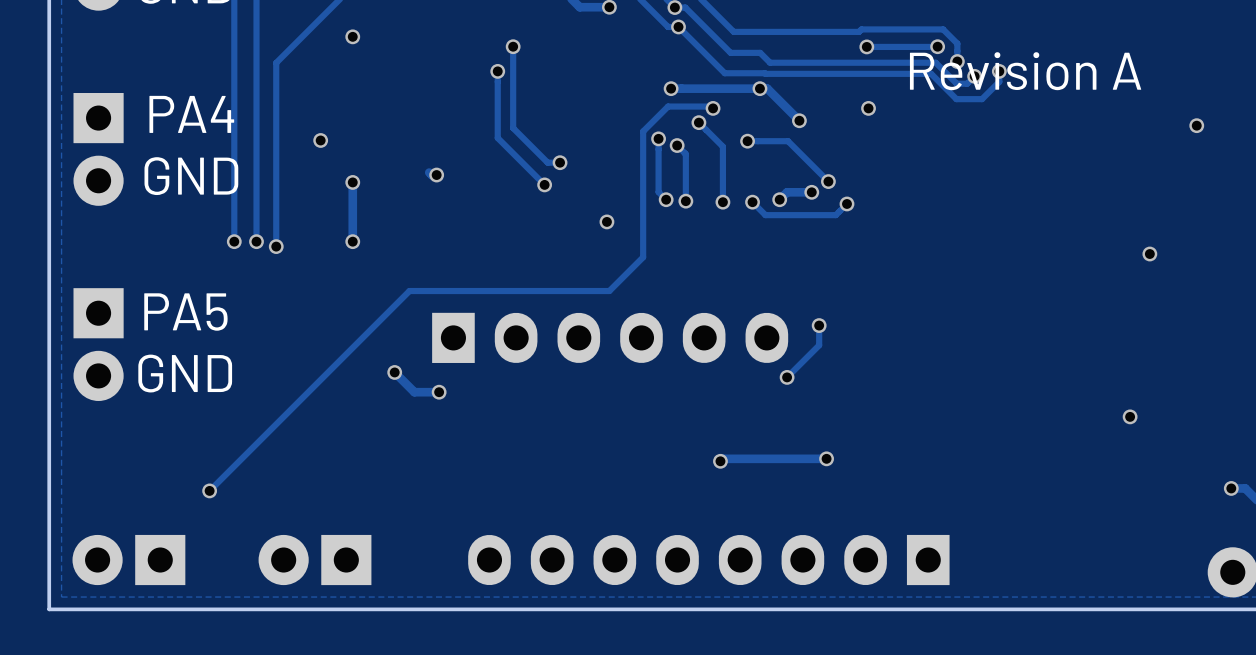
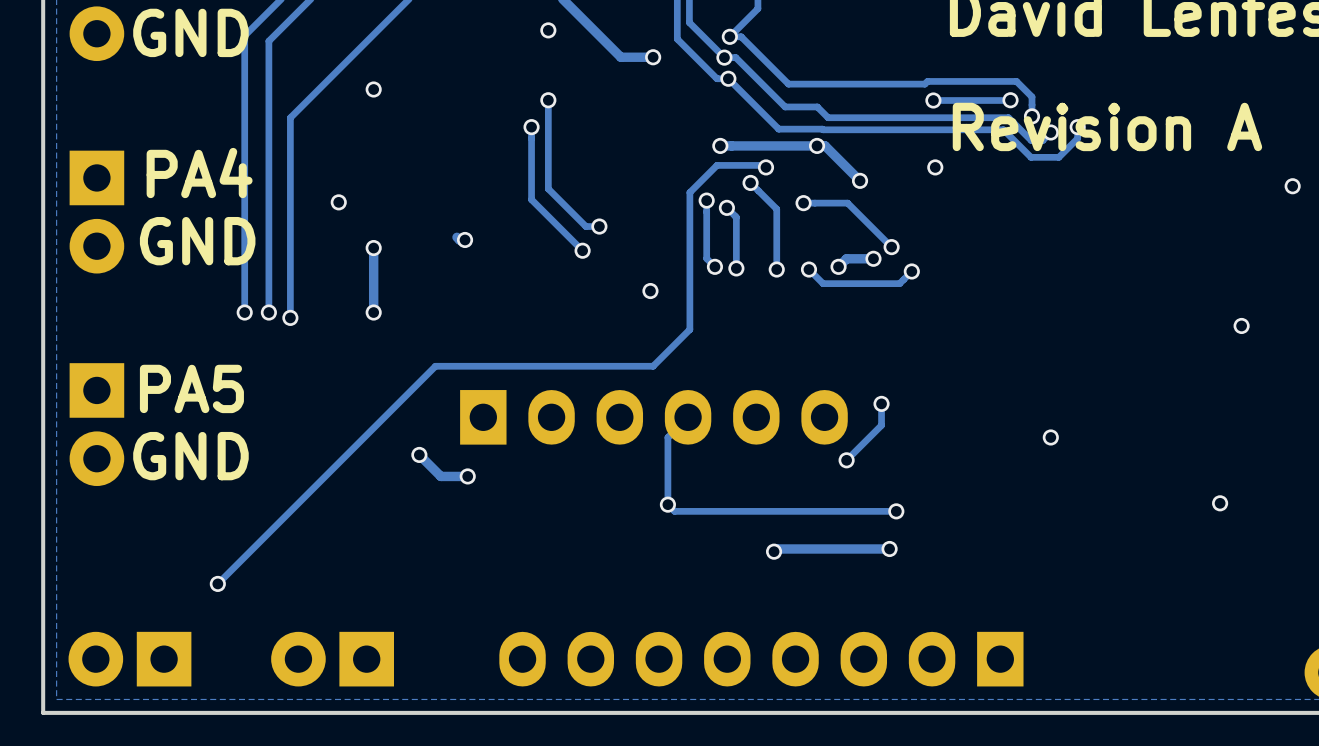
track: none -> (688, 417) (667, 437) (667, 504) (674, 511) (896, 511)
via: none -> (1050, 437)
via: none -> (667, 504)
via: none -> (896, 511)

